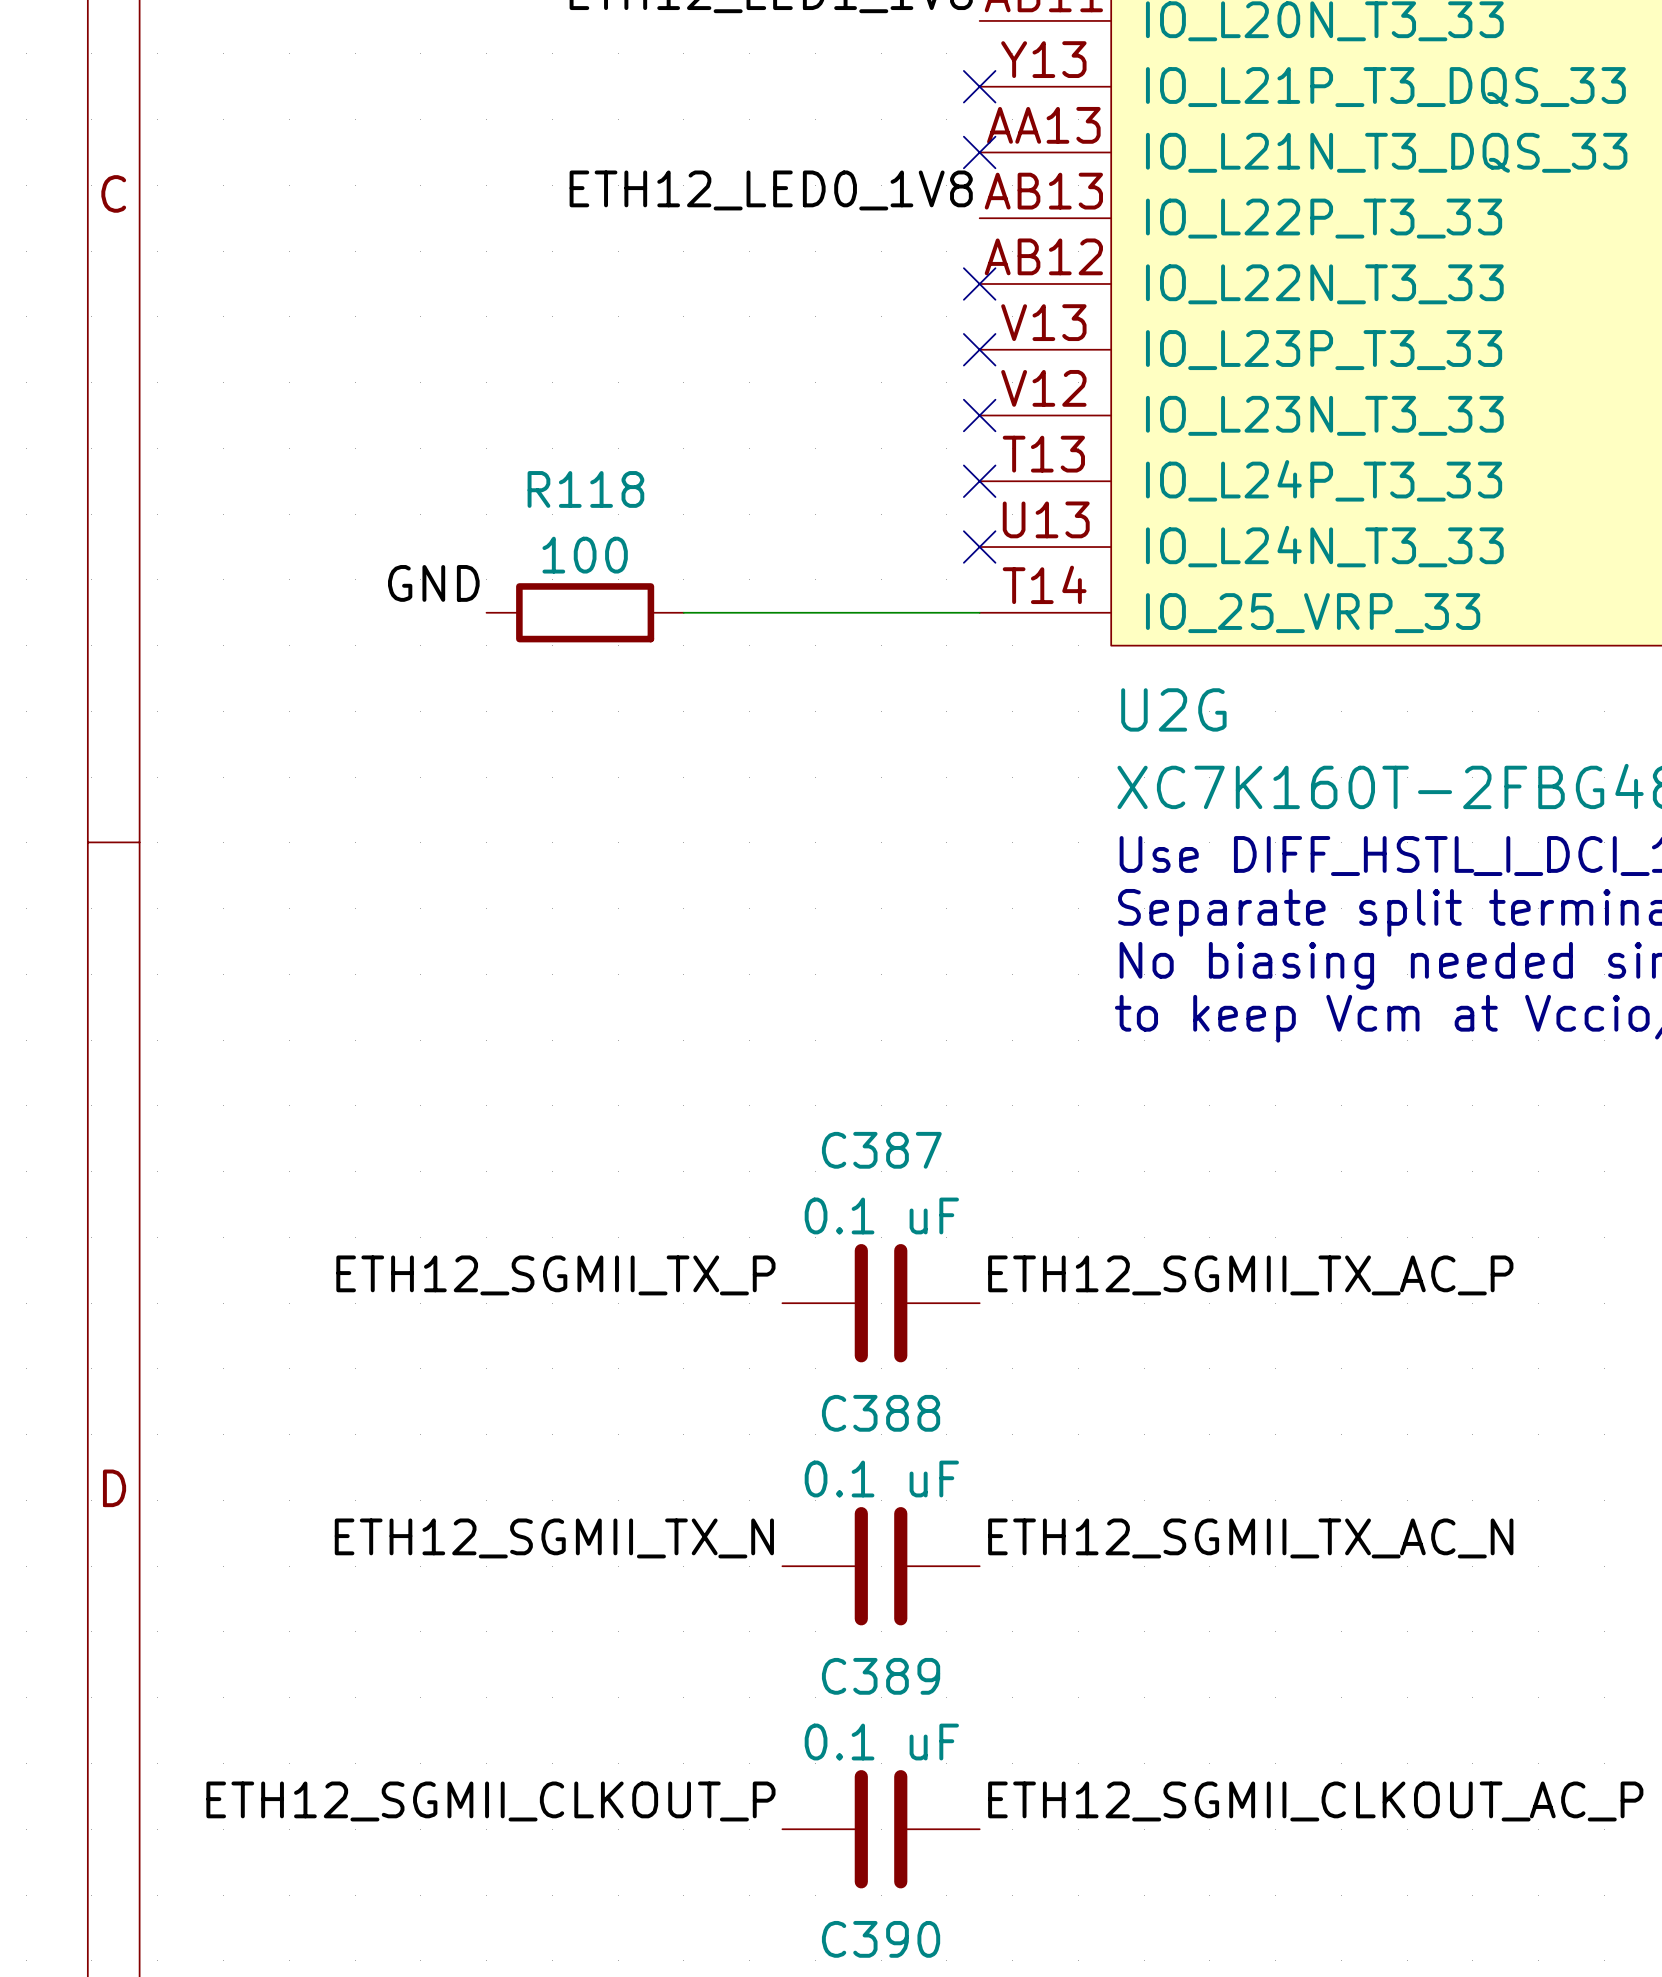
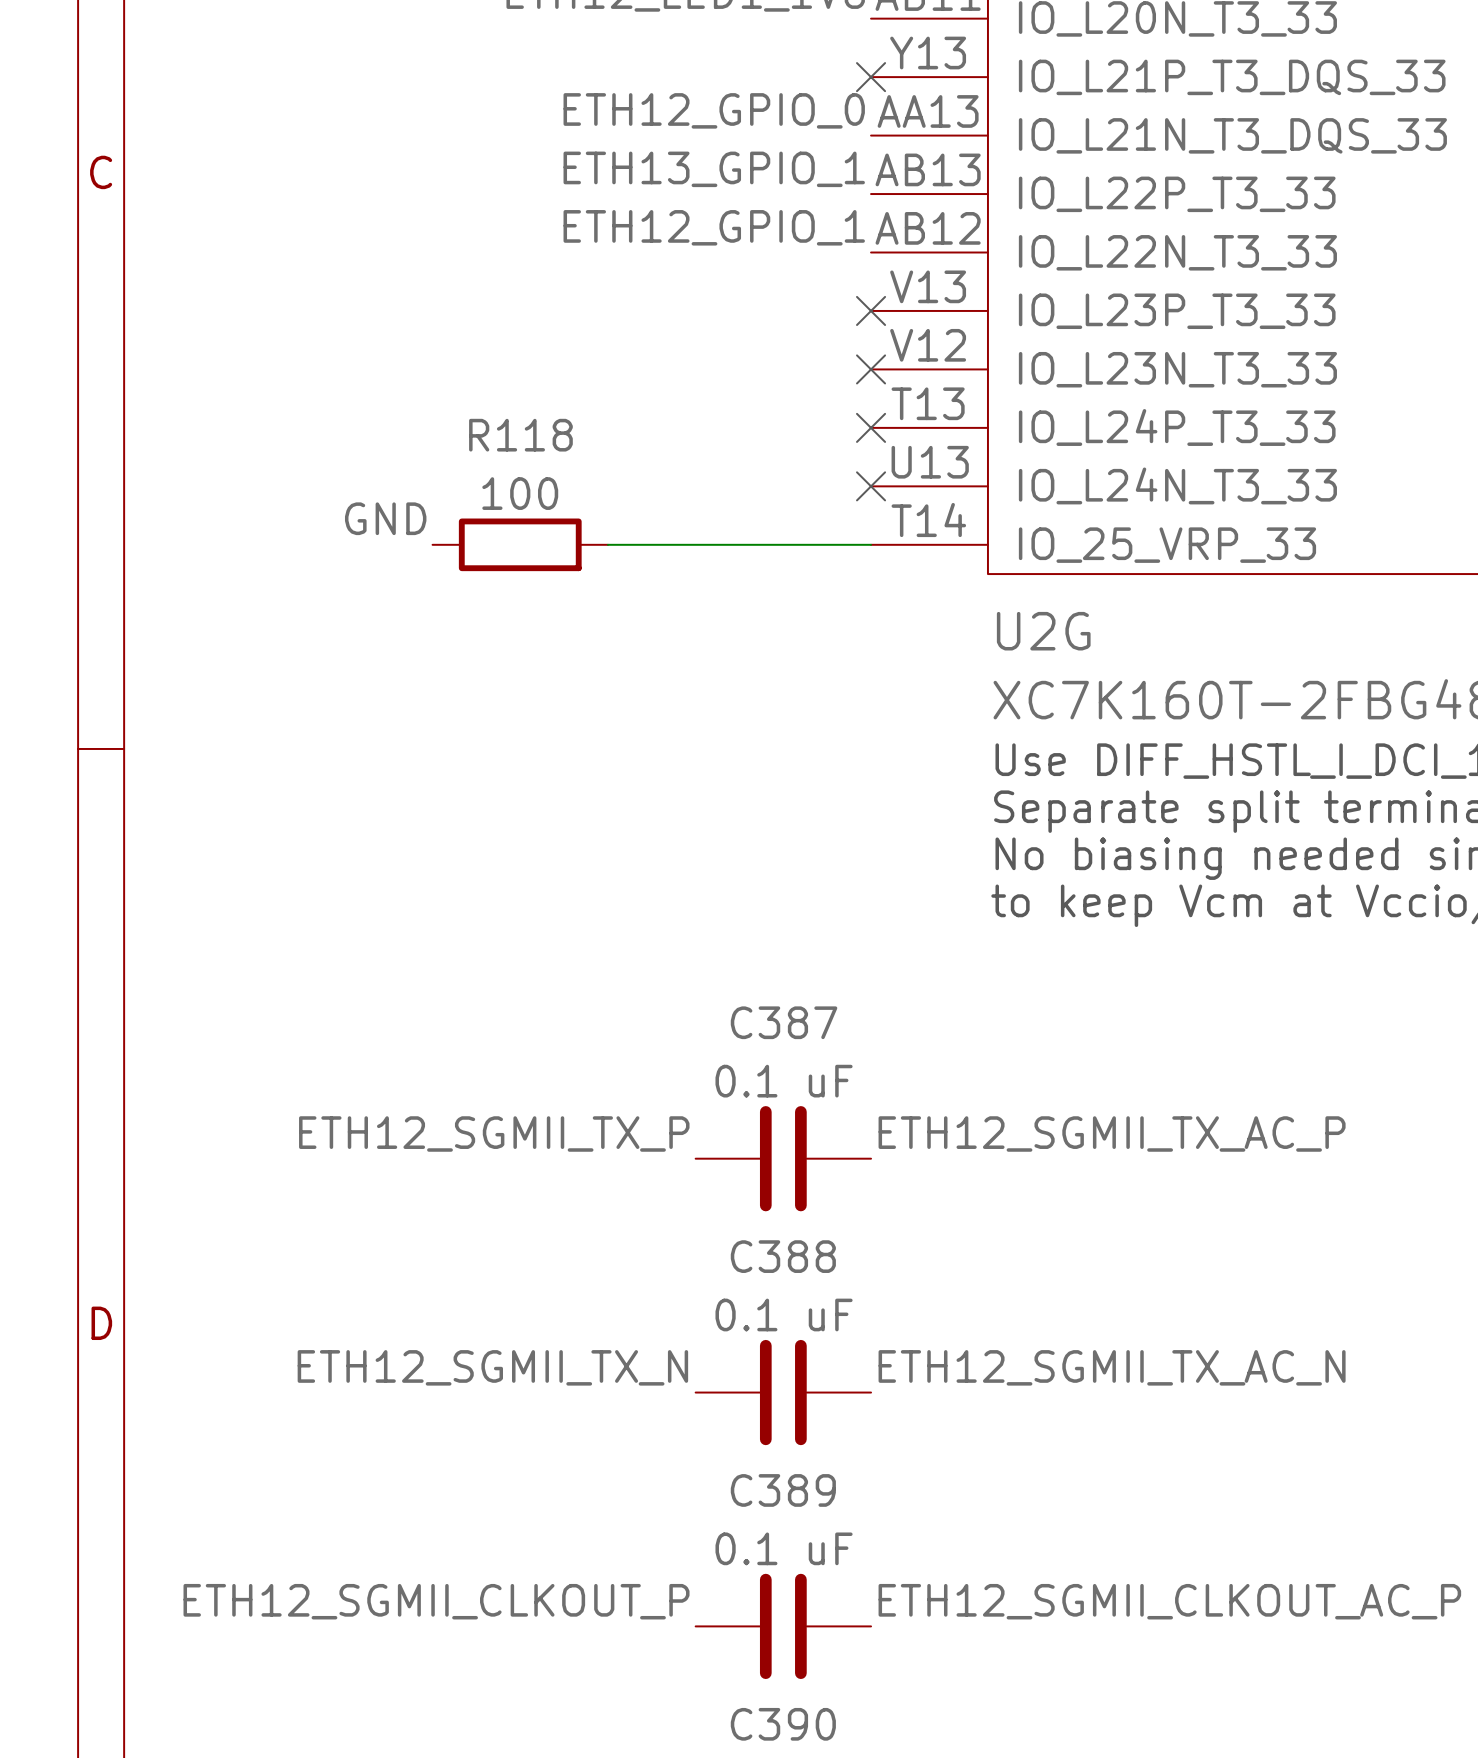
label: none -> ETH12_GPIO_0 (714, 110)
no-connect mark: (979, 152) -> none
label: ETH12_LED0_1V8 (771, 190) -> ETH13_GPIO_1 (714, 169)
label: none -> ETH12_GPIO_1 (714, 227)
no-connect mark: (979, 283) -> none

